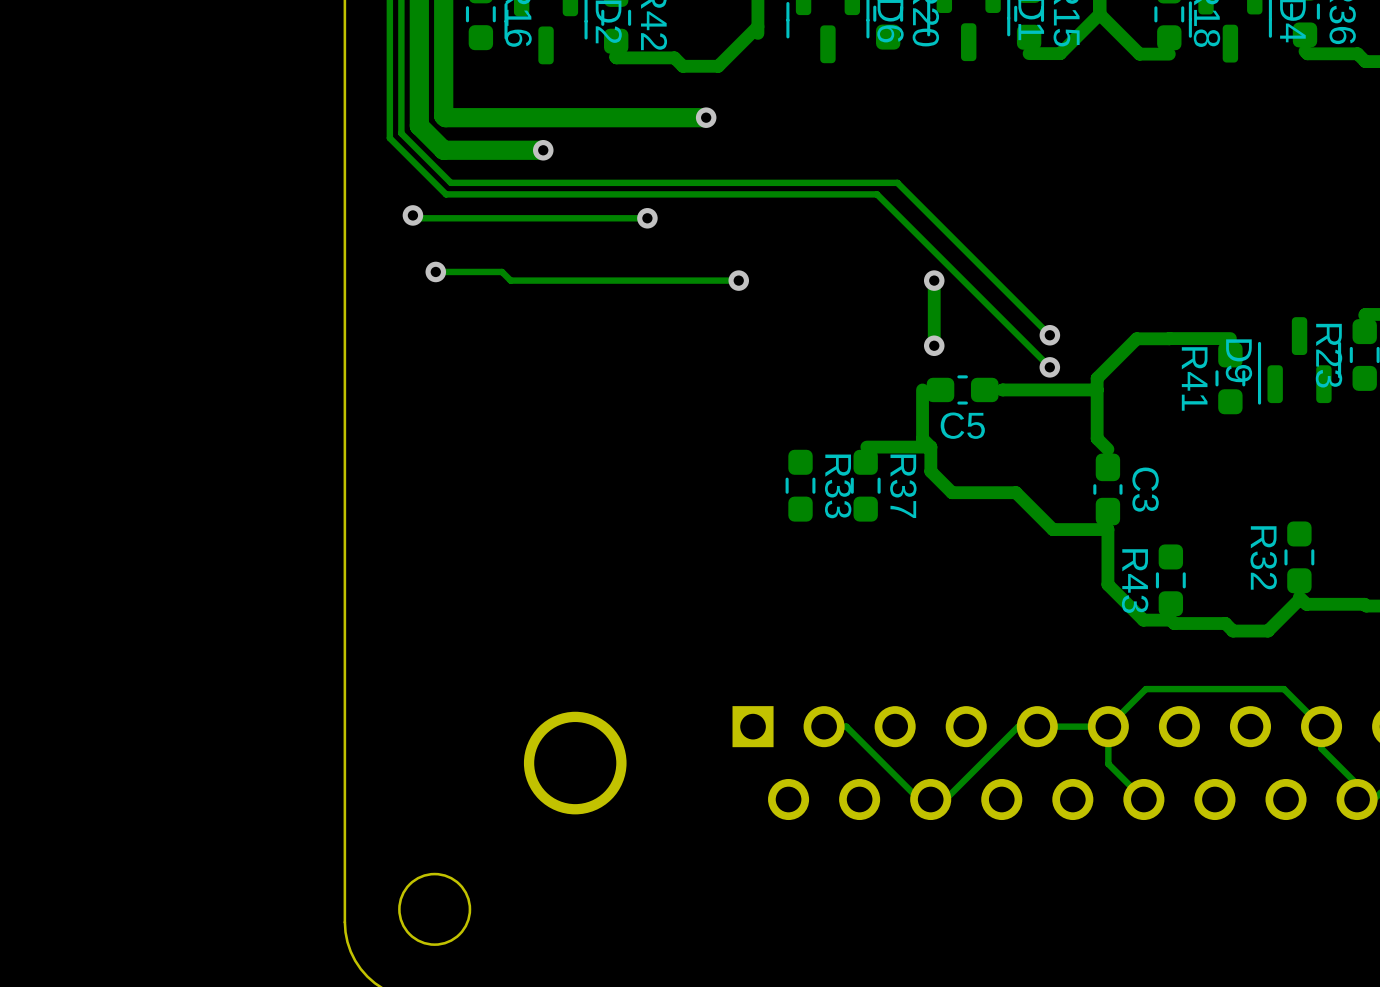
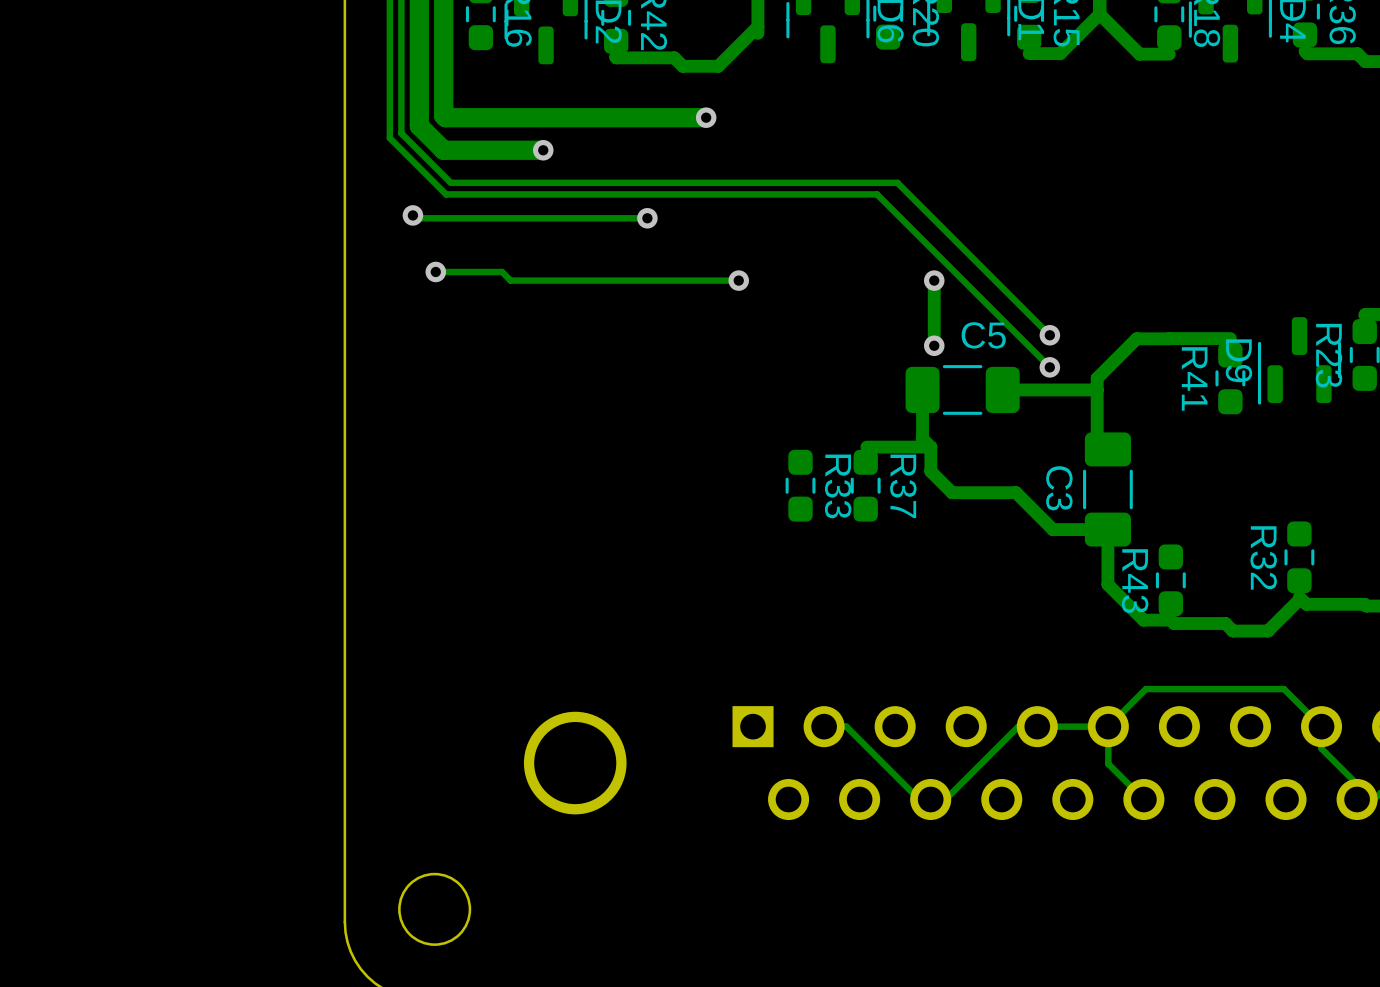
C5 footprint: [926, 375, 999, 405] -> [905, 365, 1020, 415]
C5 name position: C5 (962, 425) -> C5 (983, 335)
C3 footprint: [1093, 453, 1123, 526] -> [1083, 432, 1133, 547]
C3 name position: C3 (1145, 489) -> C3 (1059, 488)

